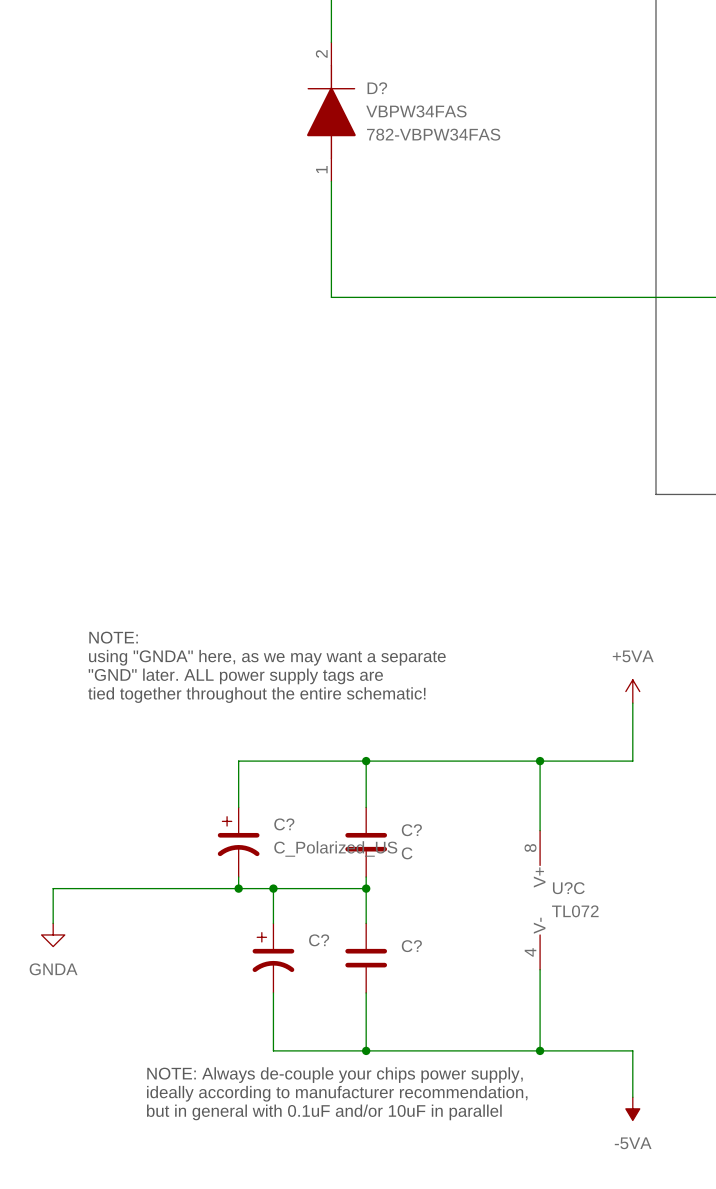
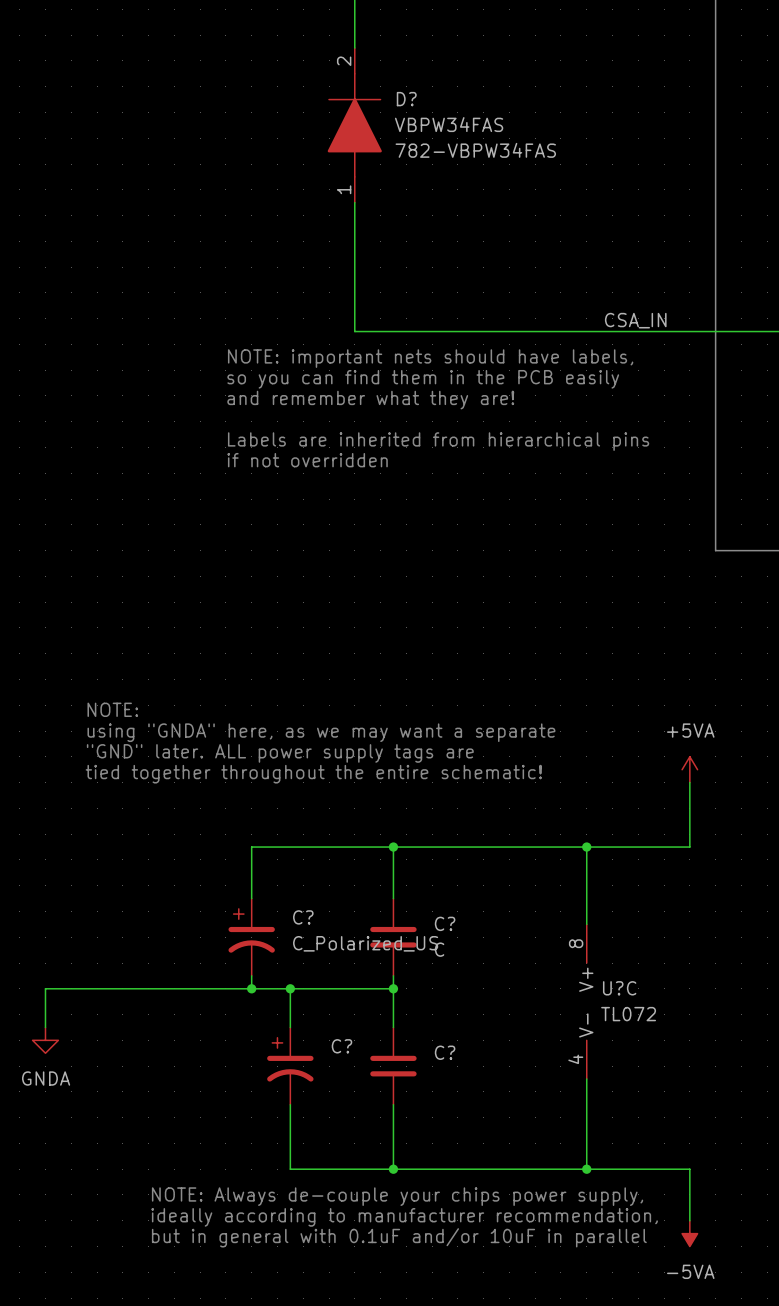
label: none -> CSA_IN (635, 320)
text: none -> NOTE: important nets should have labels, (430, 358)
text: none -> so you can find them in the PCB easily (423, 379)
text: none -> and remember what they are! (370, 400)
text: none -> Labels are inherited from hierarchical pins (438, 441)
text: none -> if not overridden (307, 460)

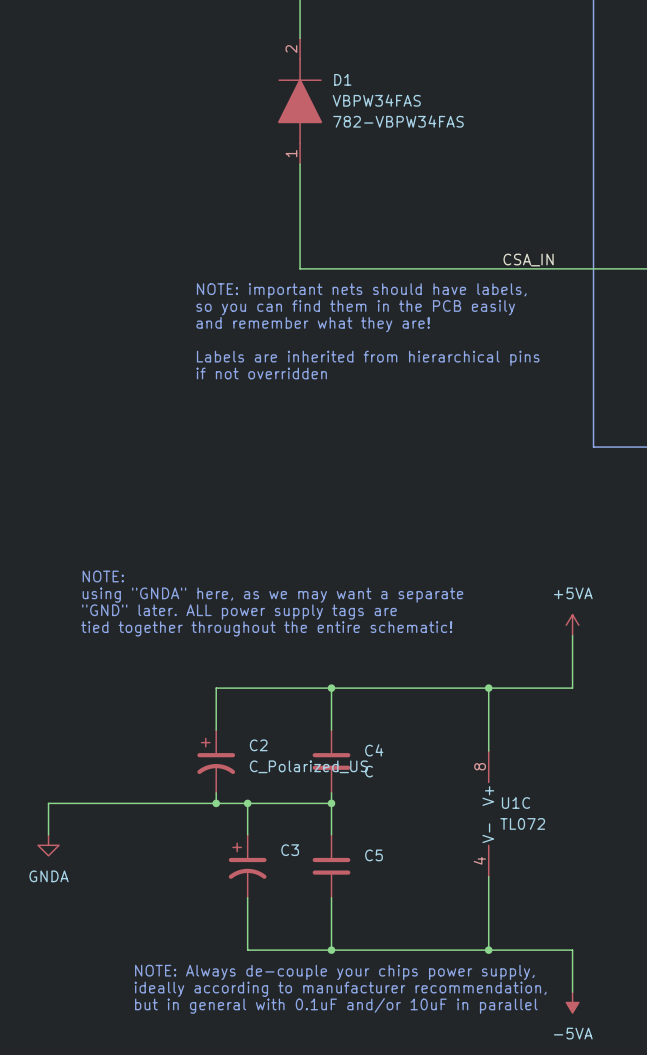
D? name: D? (406, 99) -> D1 (342, 79)
C? name: C? (303, 917) -> C2 (258, 745)
C? name: C? (445, 923) -> C4 (374, 750)
U?C name: U?C (619, 988) -> U1C (515, 803)
C? name: C? (341, 1046) -> C3 (290, 850)
C? name: C? (445, 1052) -> C5 (374, 855)

